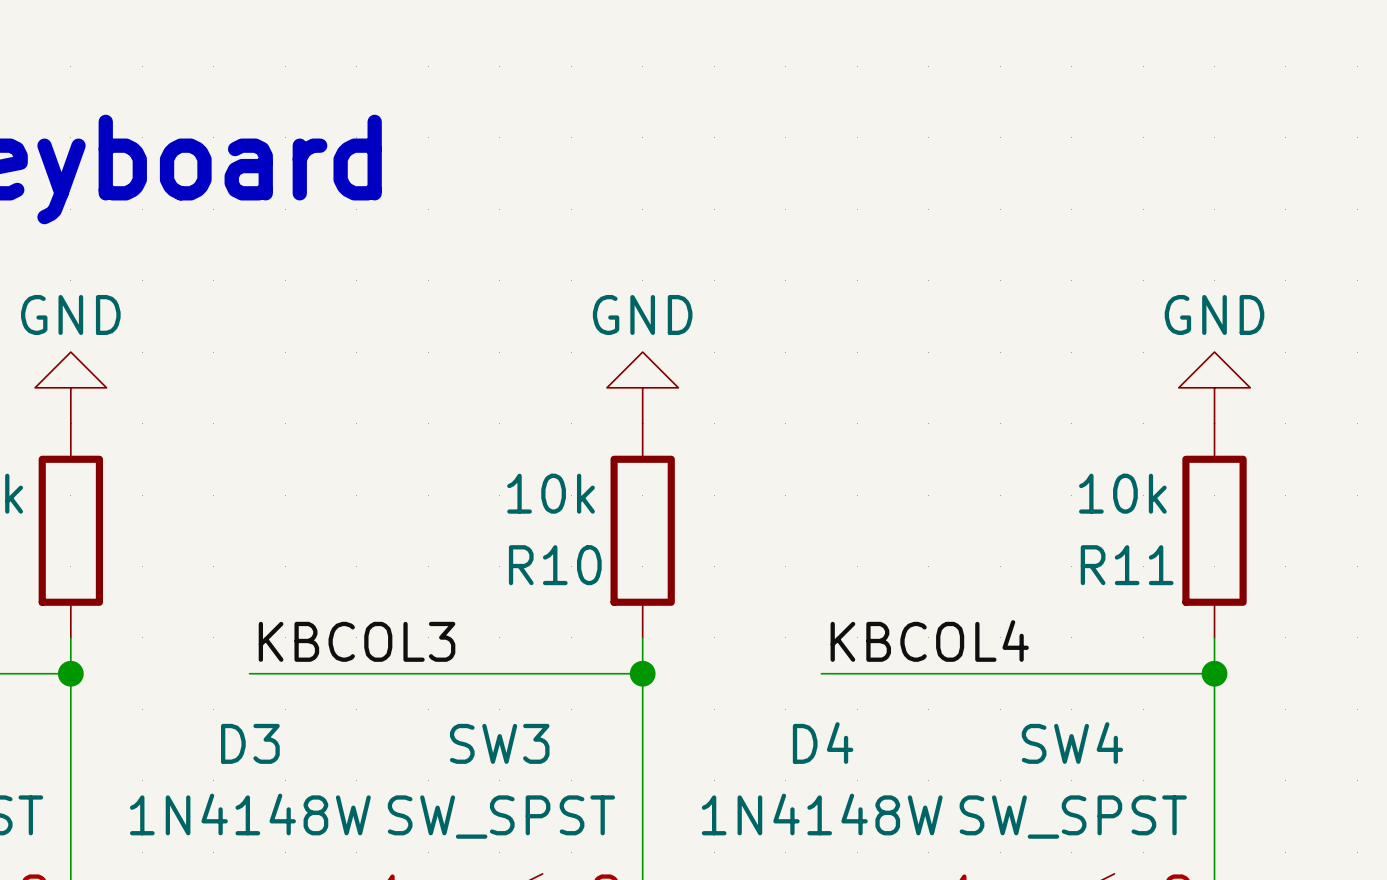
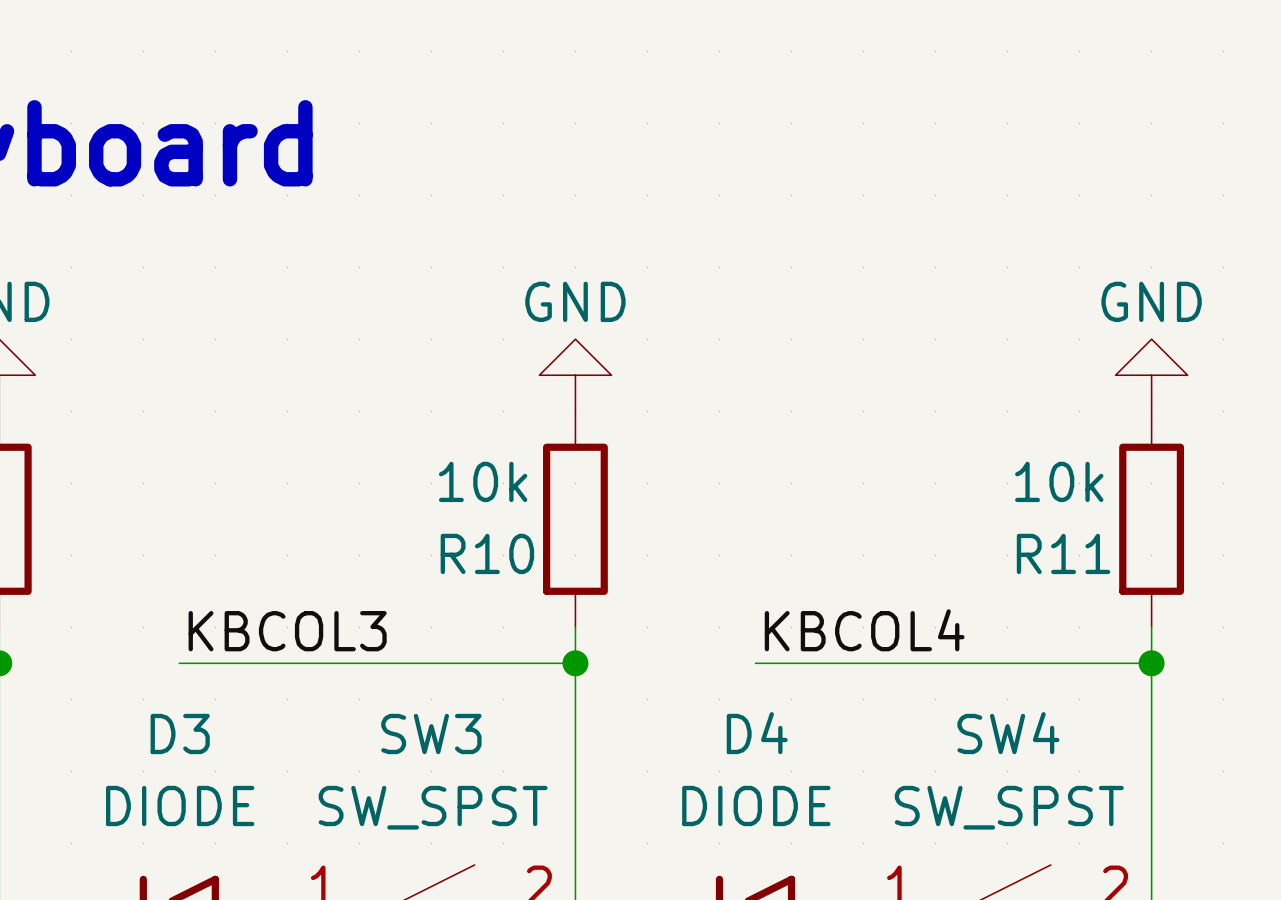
D3 value: 1N4148W (250, 814) -> DIODE (180, 806)
D4 value: 1N4148W (822, 814) -> DIODE (756, 806)

